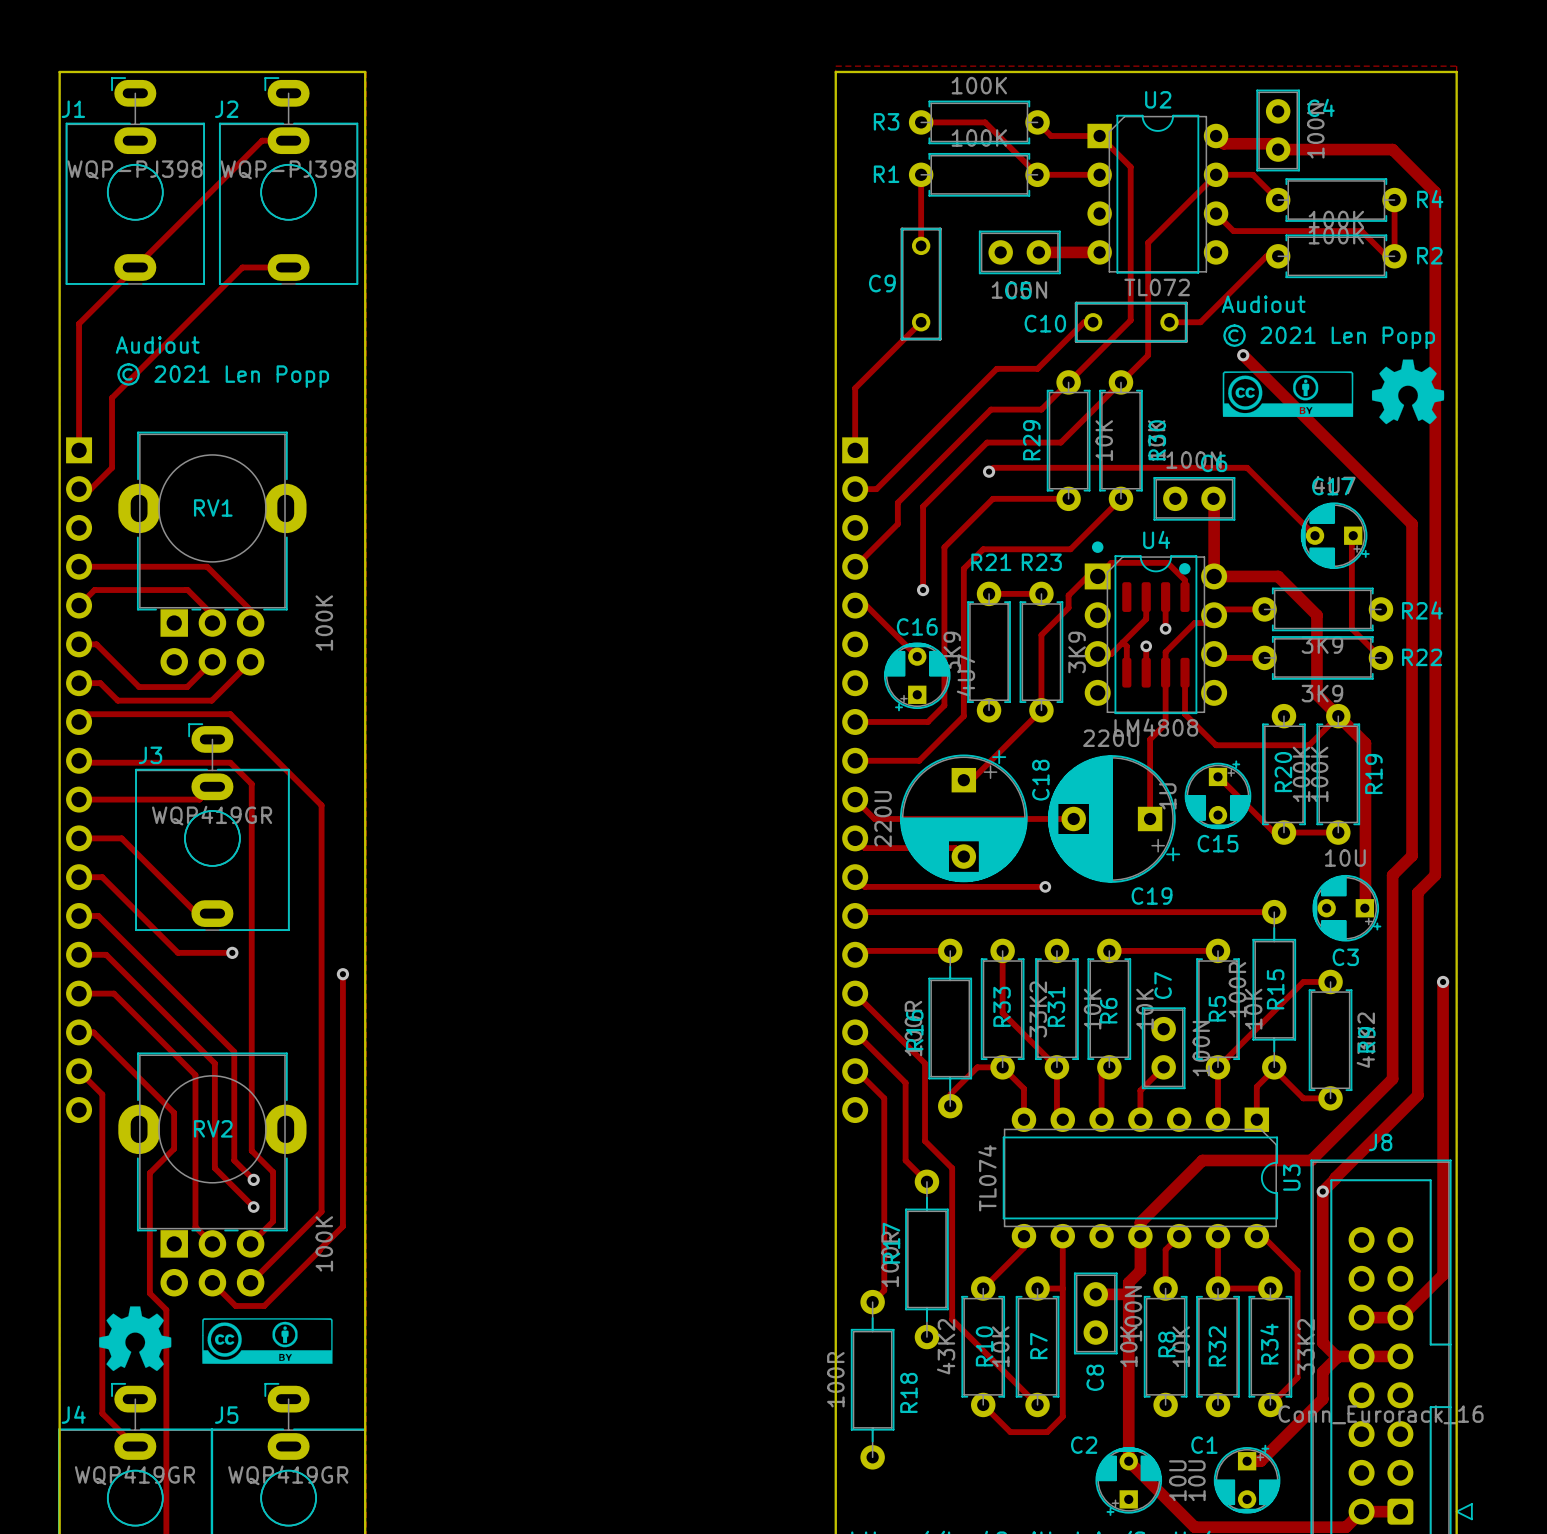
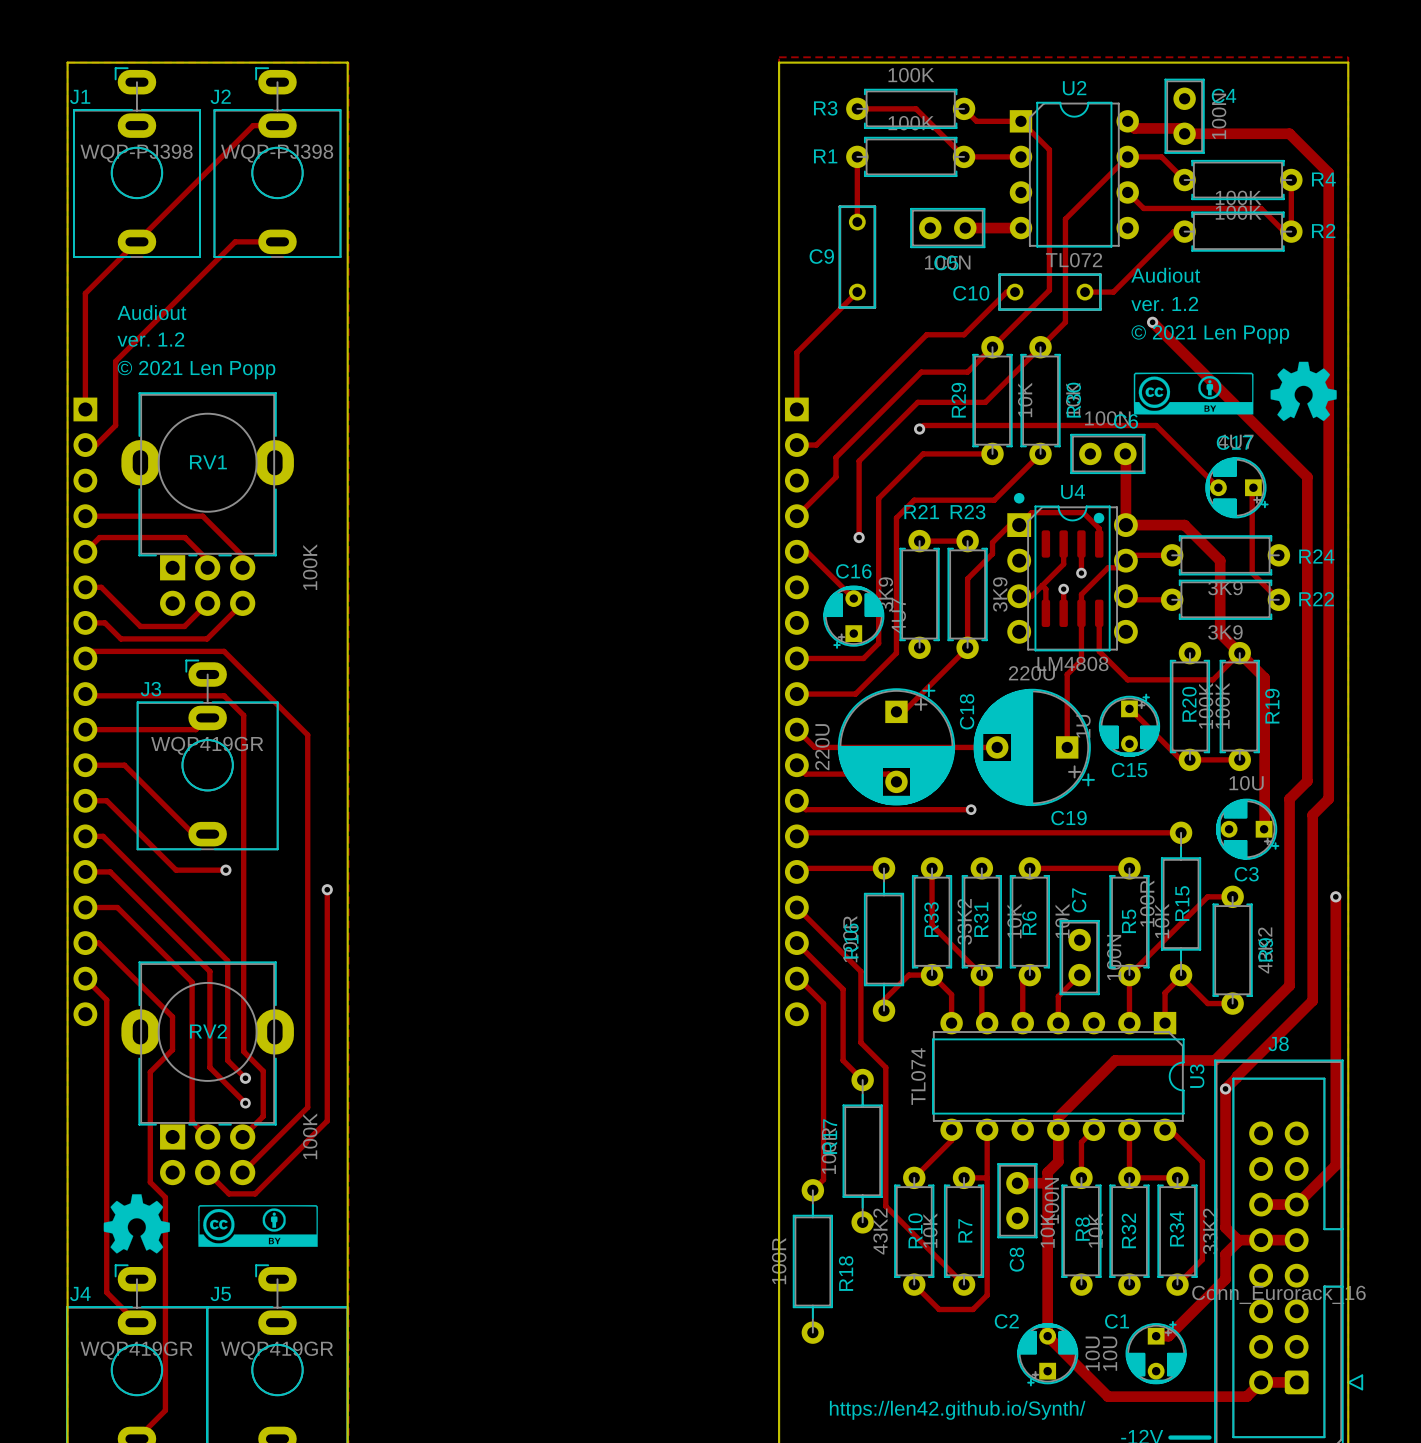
text: © 2021 Len Popp (1329, 336) -> ver. 1.2 (1164, 304)
text: none -> © 2021 Len Popp (1210, 334)
text: © 2021 Len Popp (223, 375) -> ver. 1.2 (150, 339)
drawing position: (1408, 391) -> (1303, 391)
drawing position: (1288, 394) -> (1193, 393)
text: none -> © 2021 Len Popp (196, 370)

